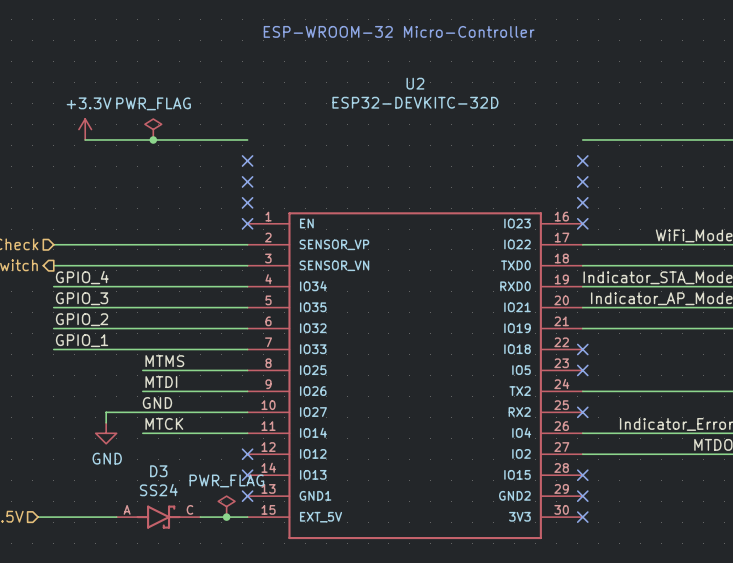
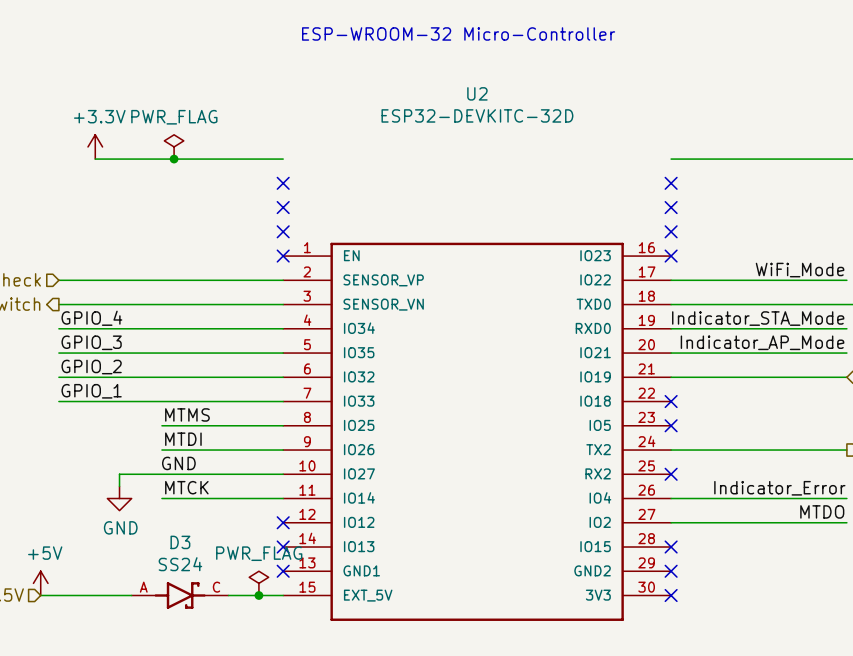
power symbol: none -> +5V (40, 583)

